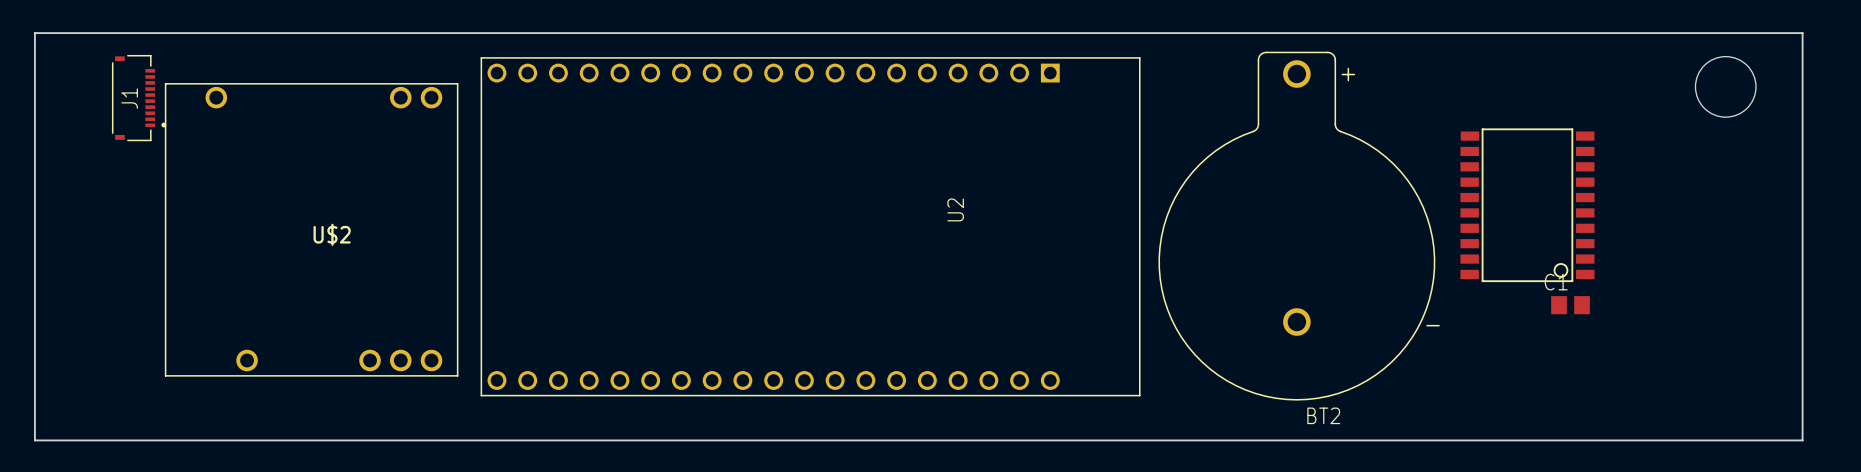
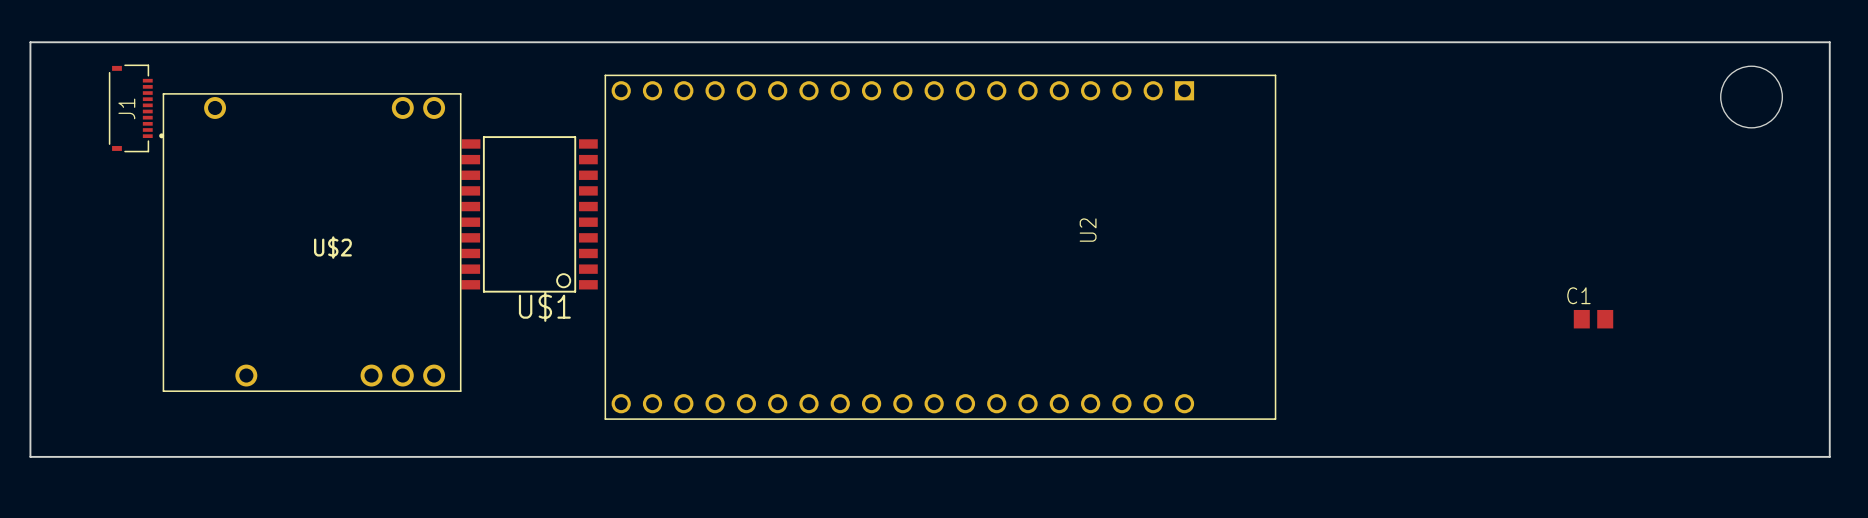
U$1: none -> (529, 214)
part: (1527, 205) -> none
U2 position: (810, 226) -> (940, 247)
BT2: (1299, 226) -> none

